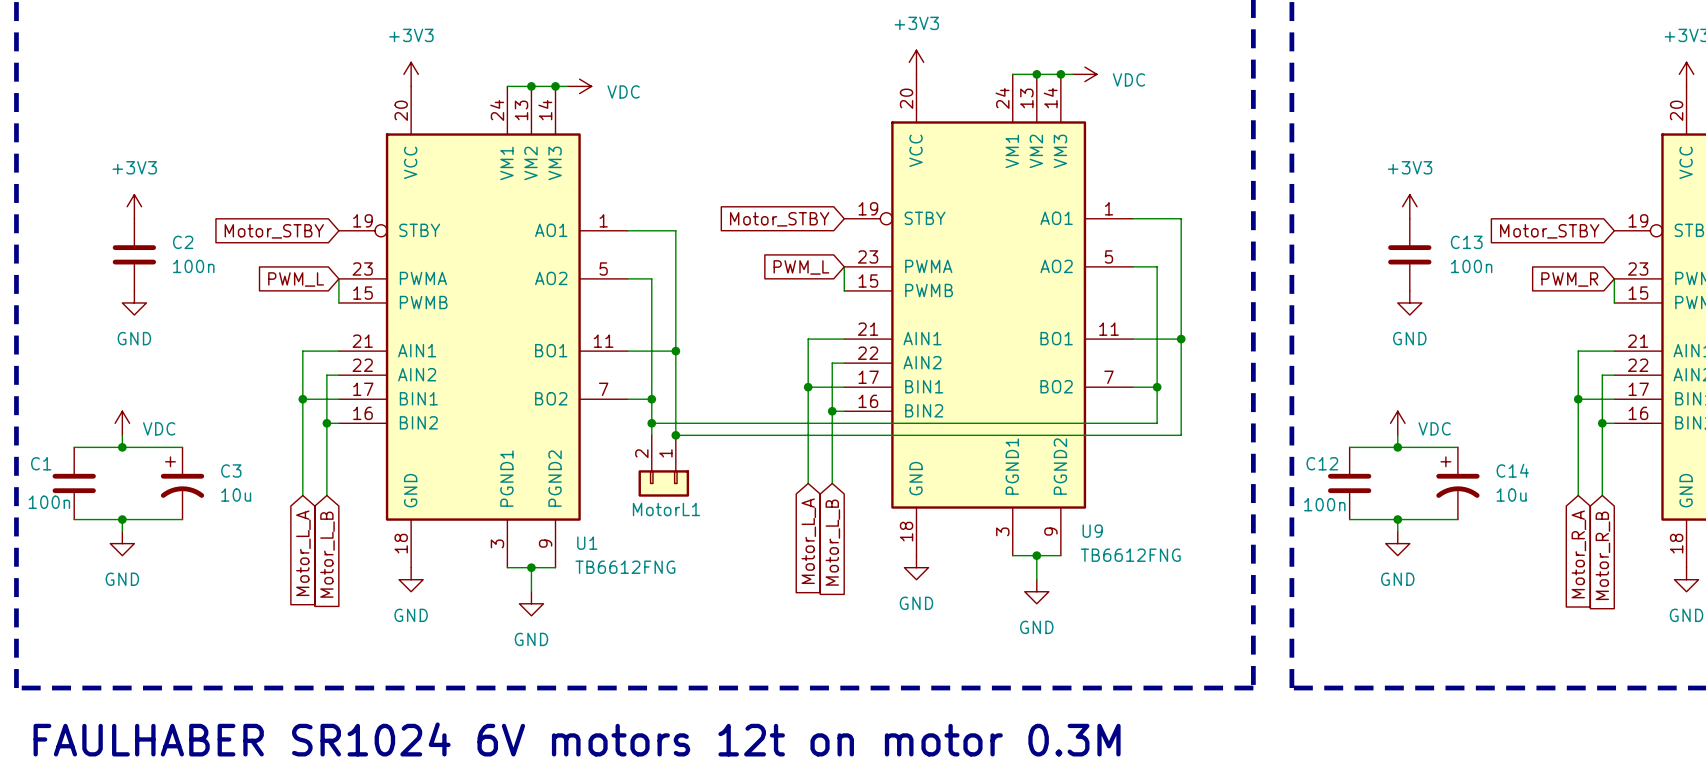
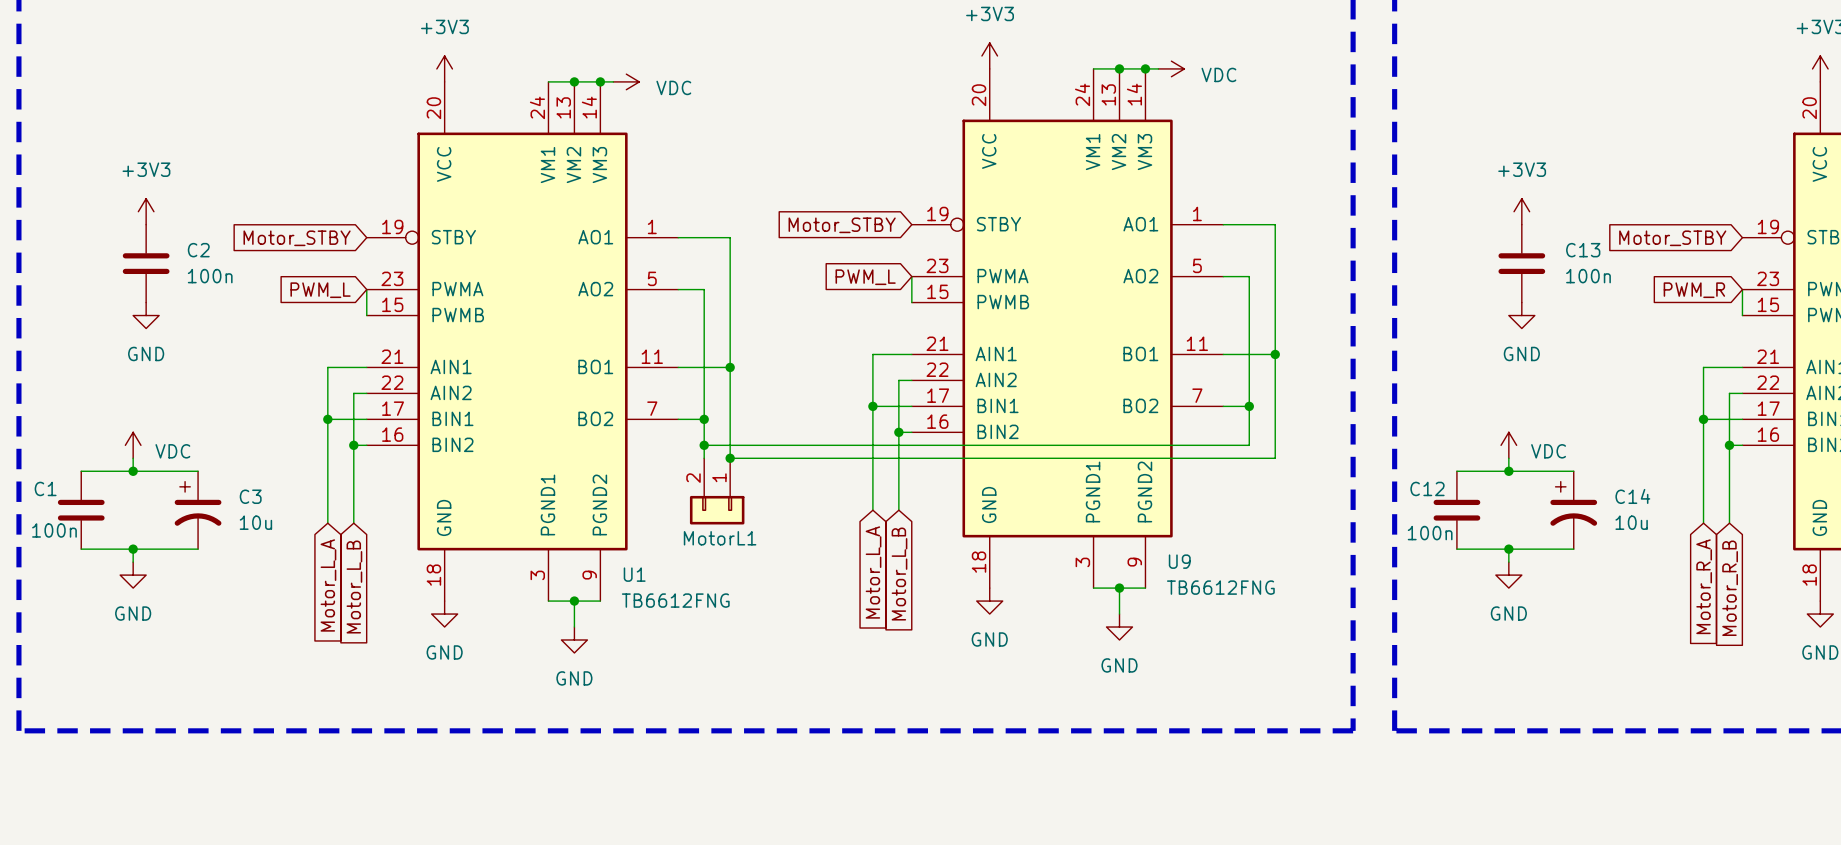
text: FAULHABER SR1024 6V motors 12t on motor 0.3M (577, 739) -> none

